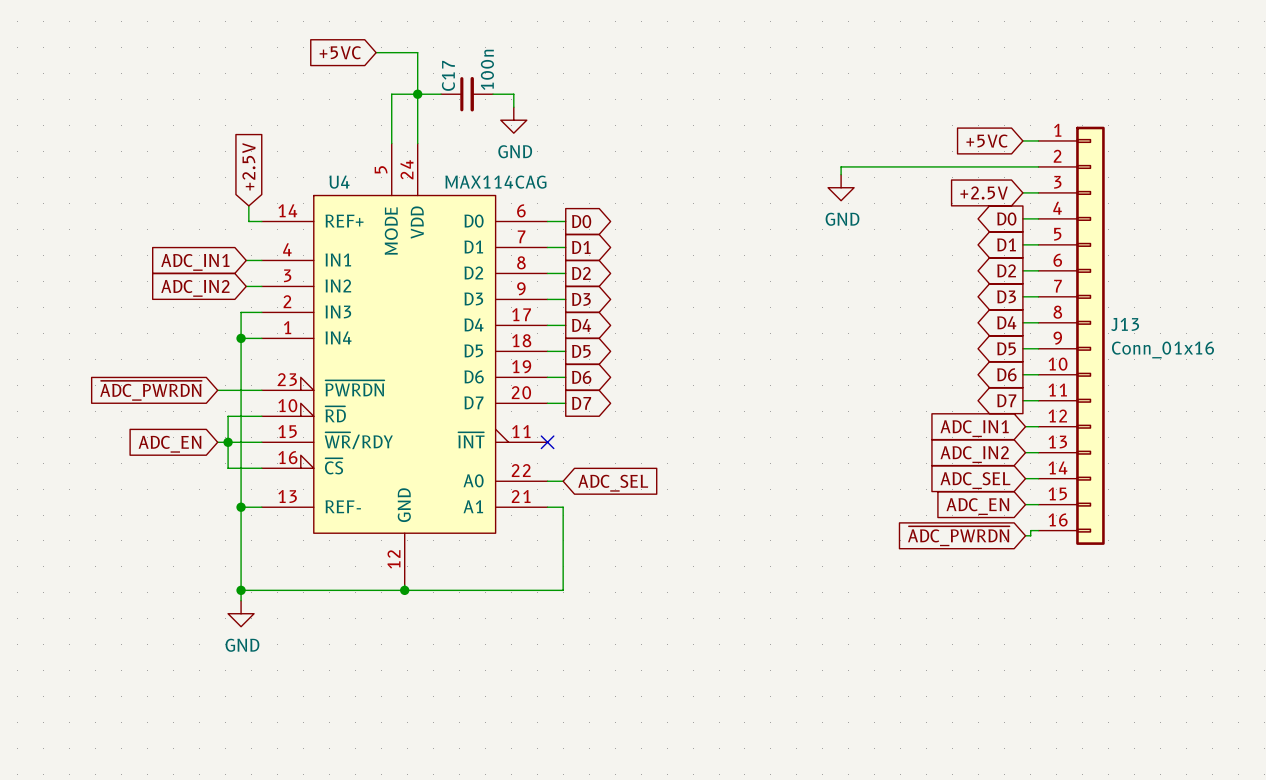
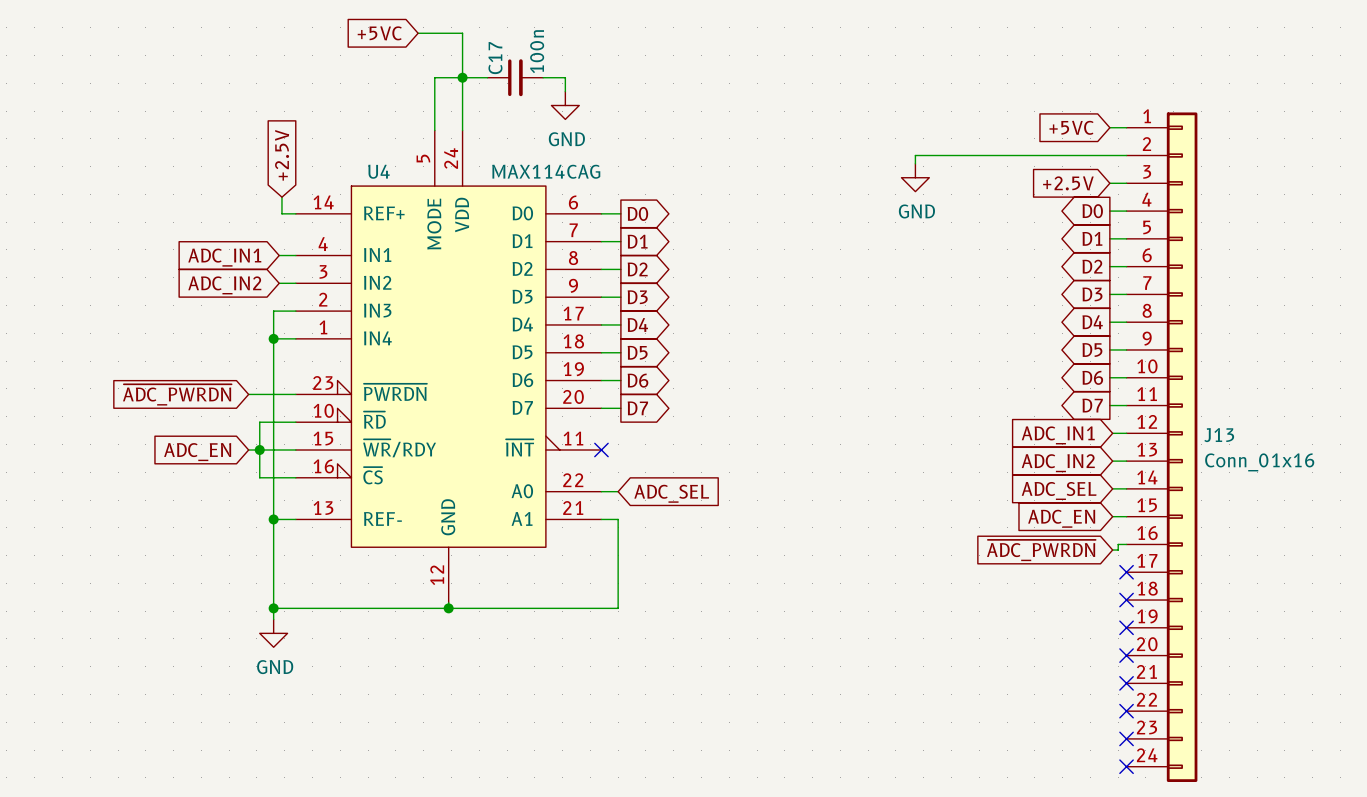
J13 symbol: [1038, 126, 1105, 545] -> [1126, 112, 1198, 782]
no-connect mark: none -> (1126, 572)
no-connect mark: none -> (1126, 600)
no-connect mark: none -> (1126, 627)
no-connect mark: none -> (1126, 655)
no-connect mark: none -> (1126, 683)
no-connect mark: none -> (1126, 711)
no-connect mark: none -> (1126, 738)
no-connect mark: none -> (1126, 766)

